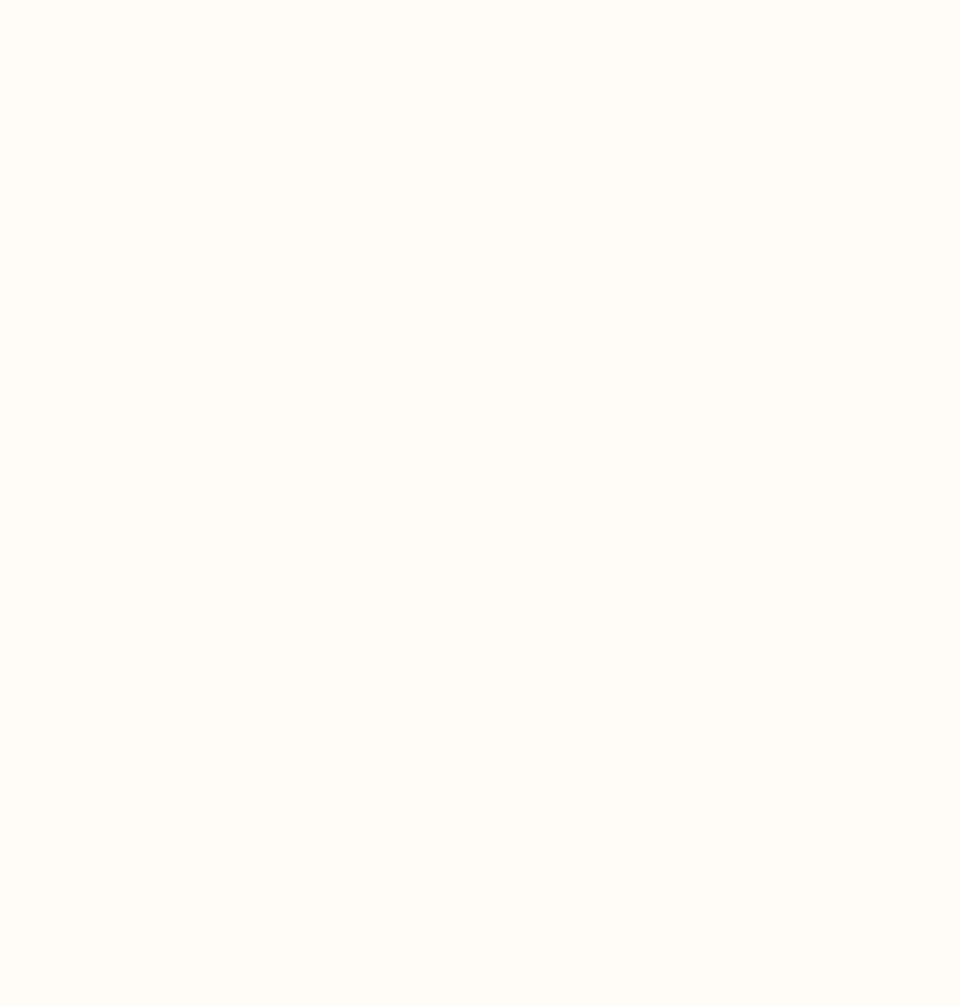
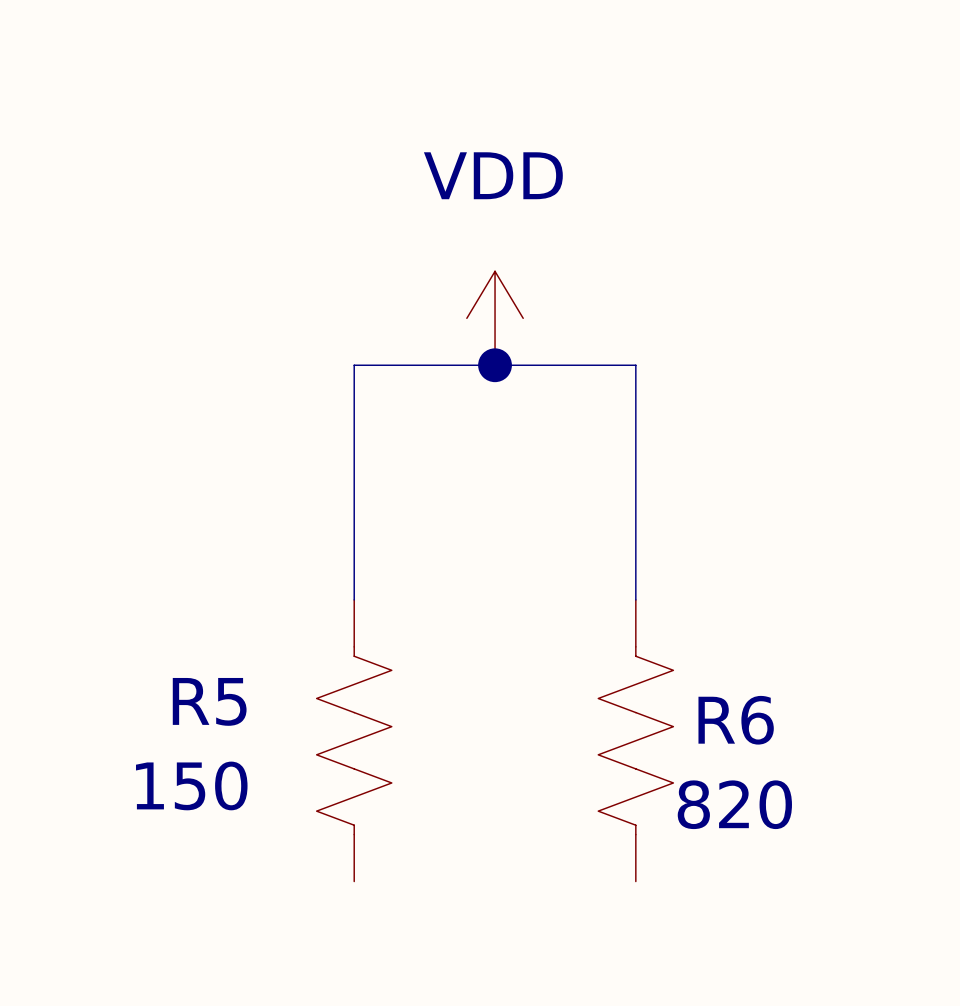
power symbol: none -> VDD (495, 318)
junction: none -> (495, 365)
wire: none -> (354, 599) (354, 365) (635, 365) (635, 599)
R5: none -> 150 (354, 740)
R6: none -> 820 (635, 740)

